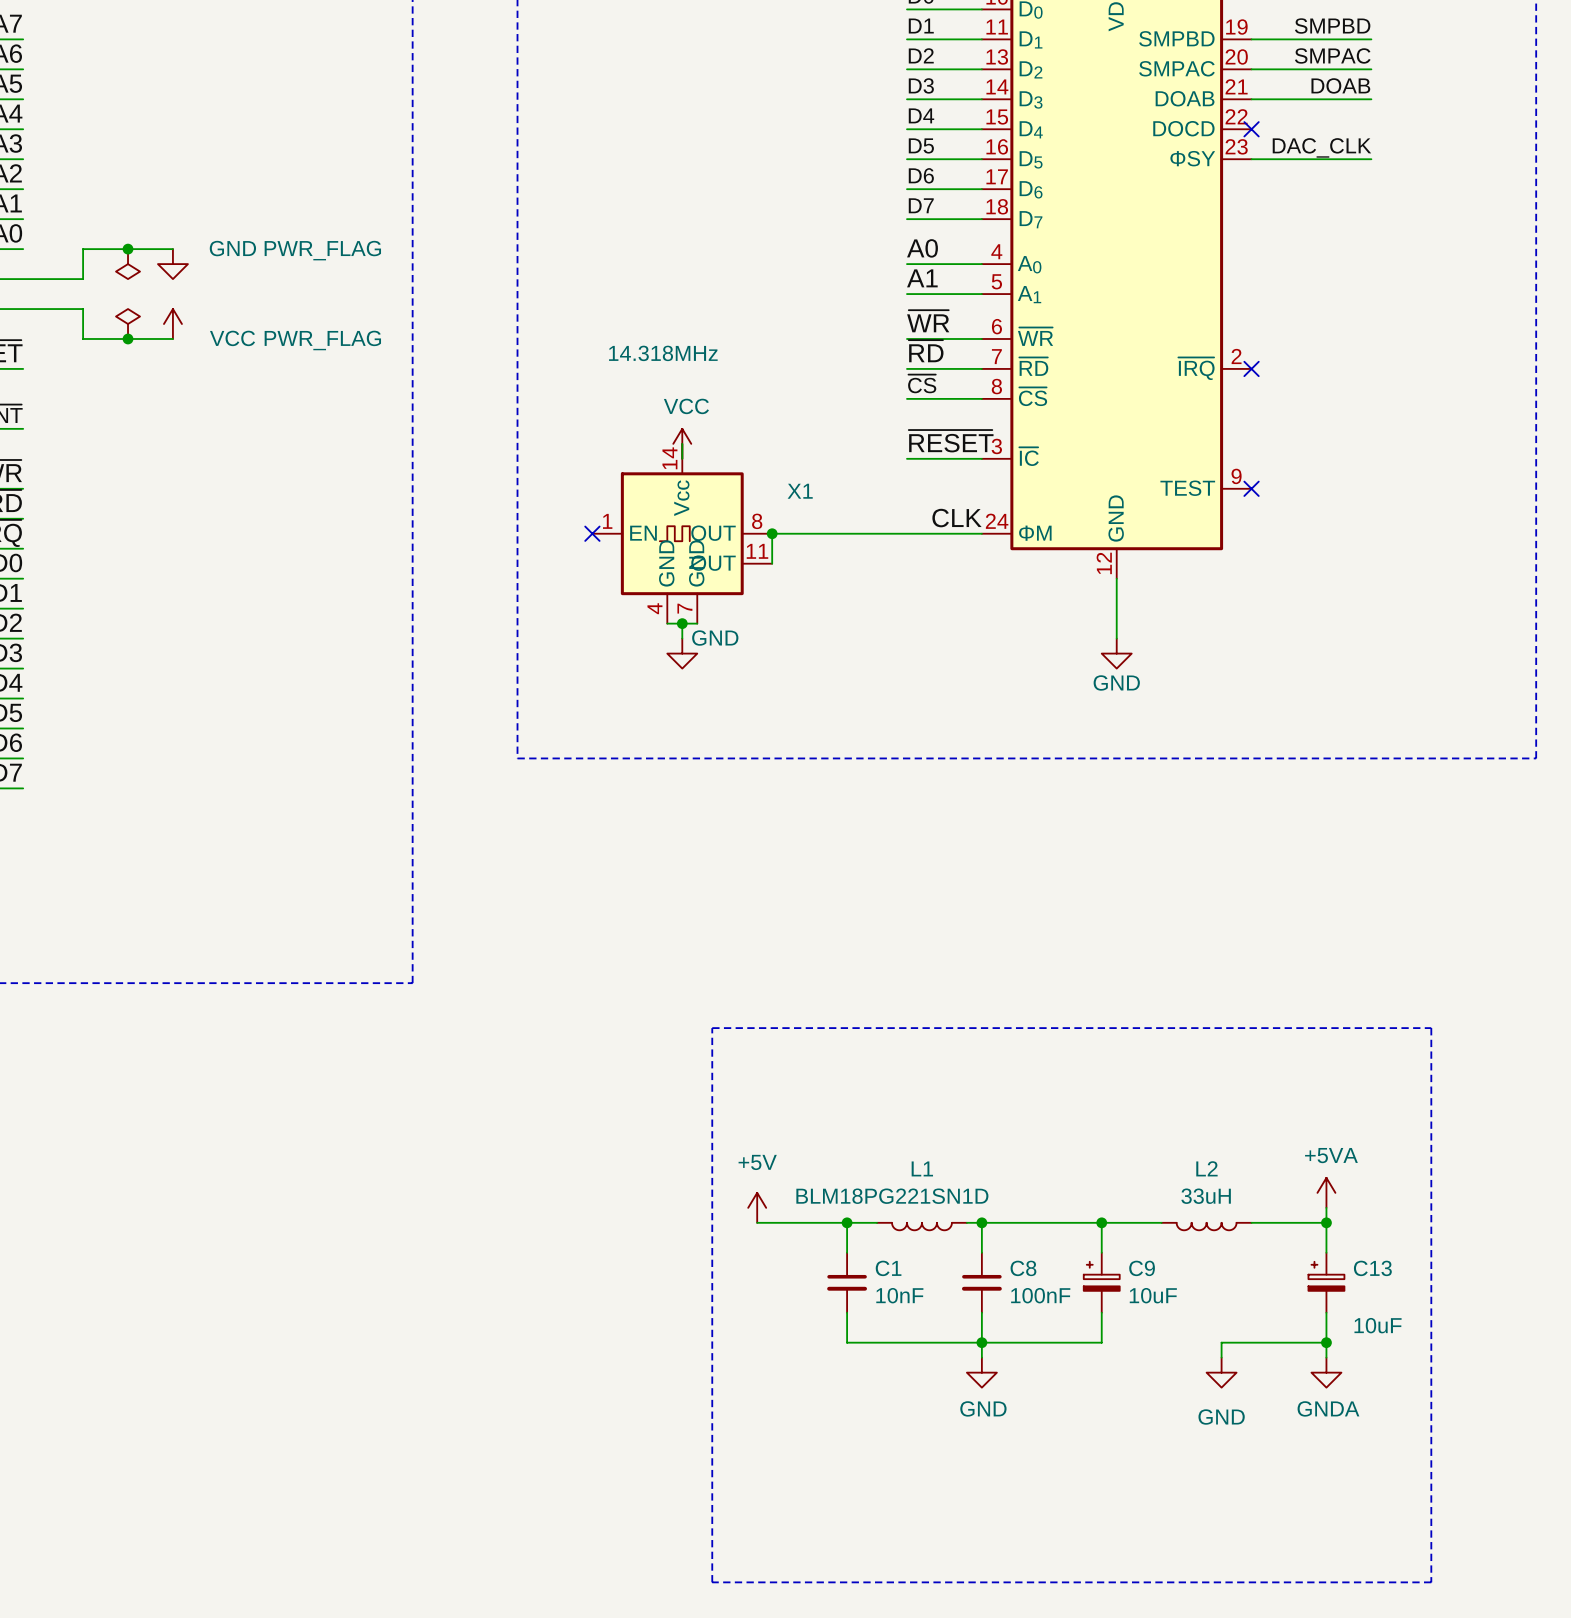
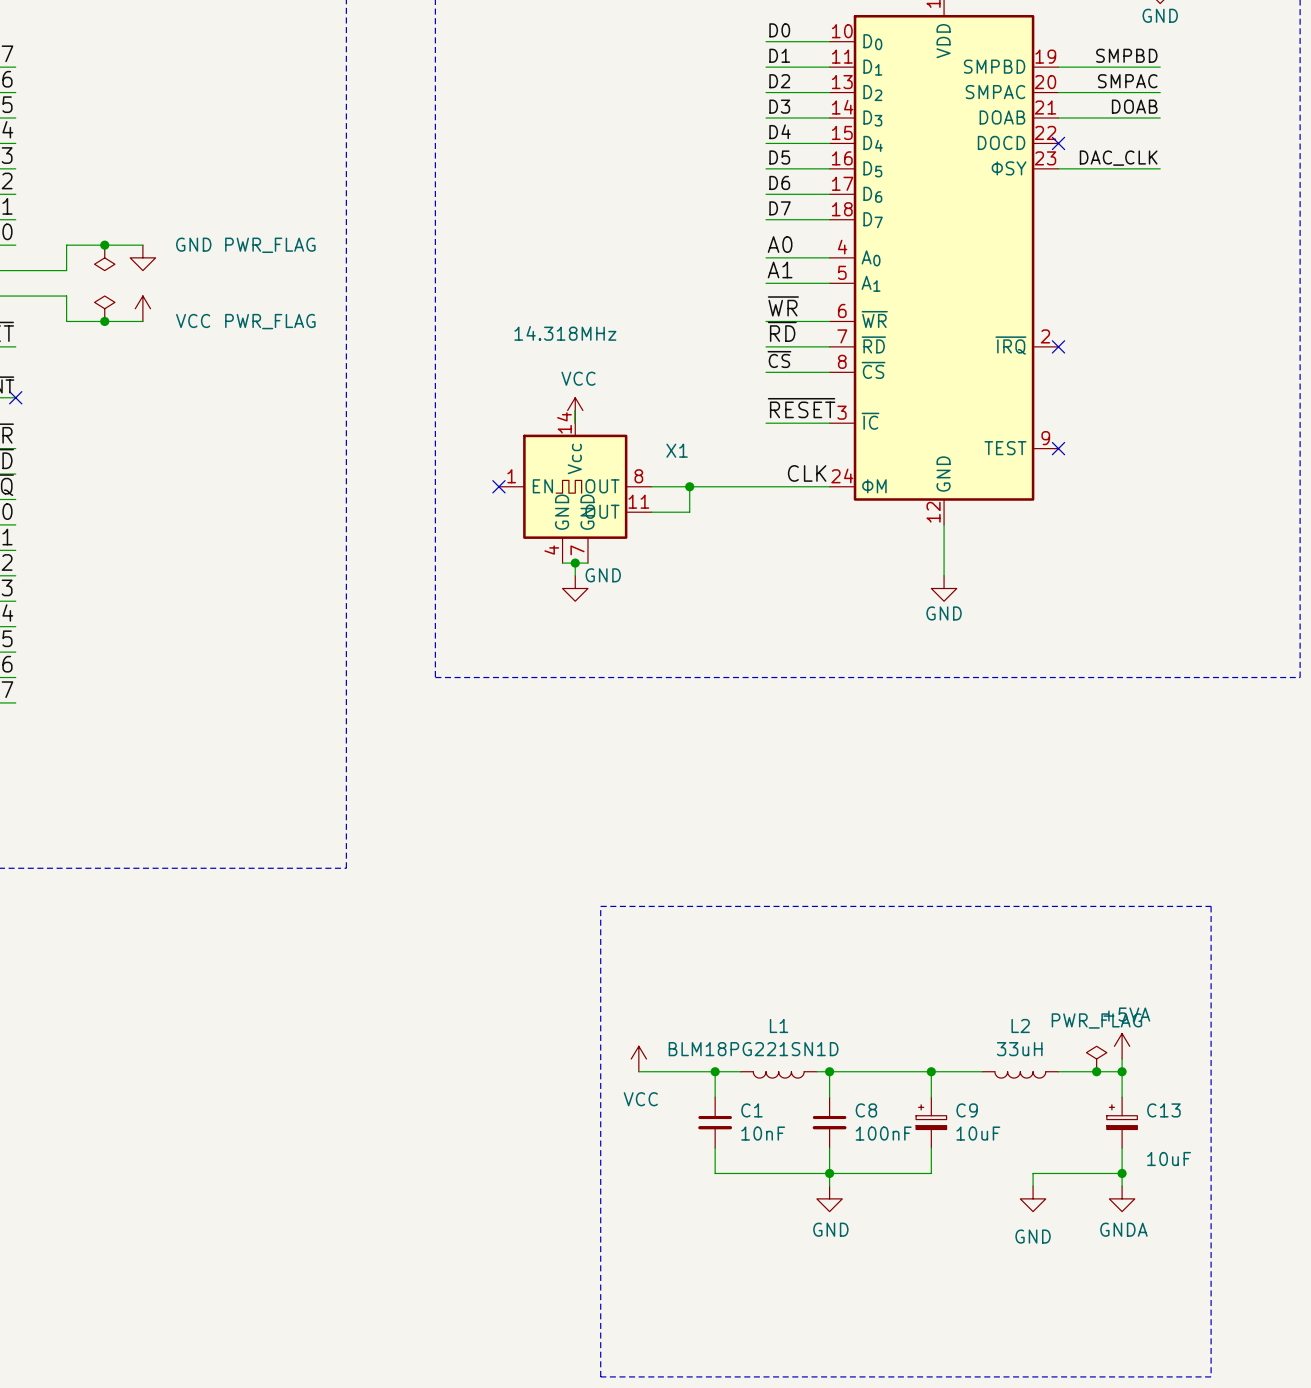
no-connect mark: none -> (15, 397)
wire: (772, 533) (772, 563) -> (689, 486) (689, 512) (651, 512)
junction position: (772, 533) -> (689, 486)
power symbol: +5V (757, 1207) -> VCC (638, 1059)
power symbol: none -> PWR_FLAG (1096, 1059)
junction: none -> (1096, 1071)

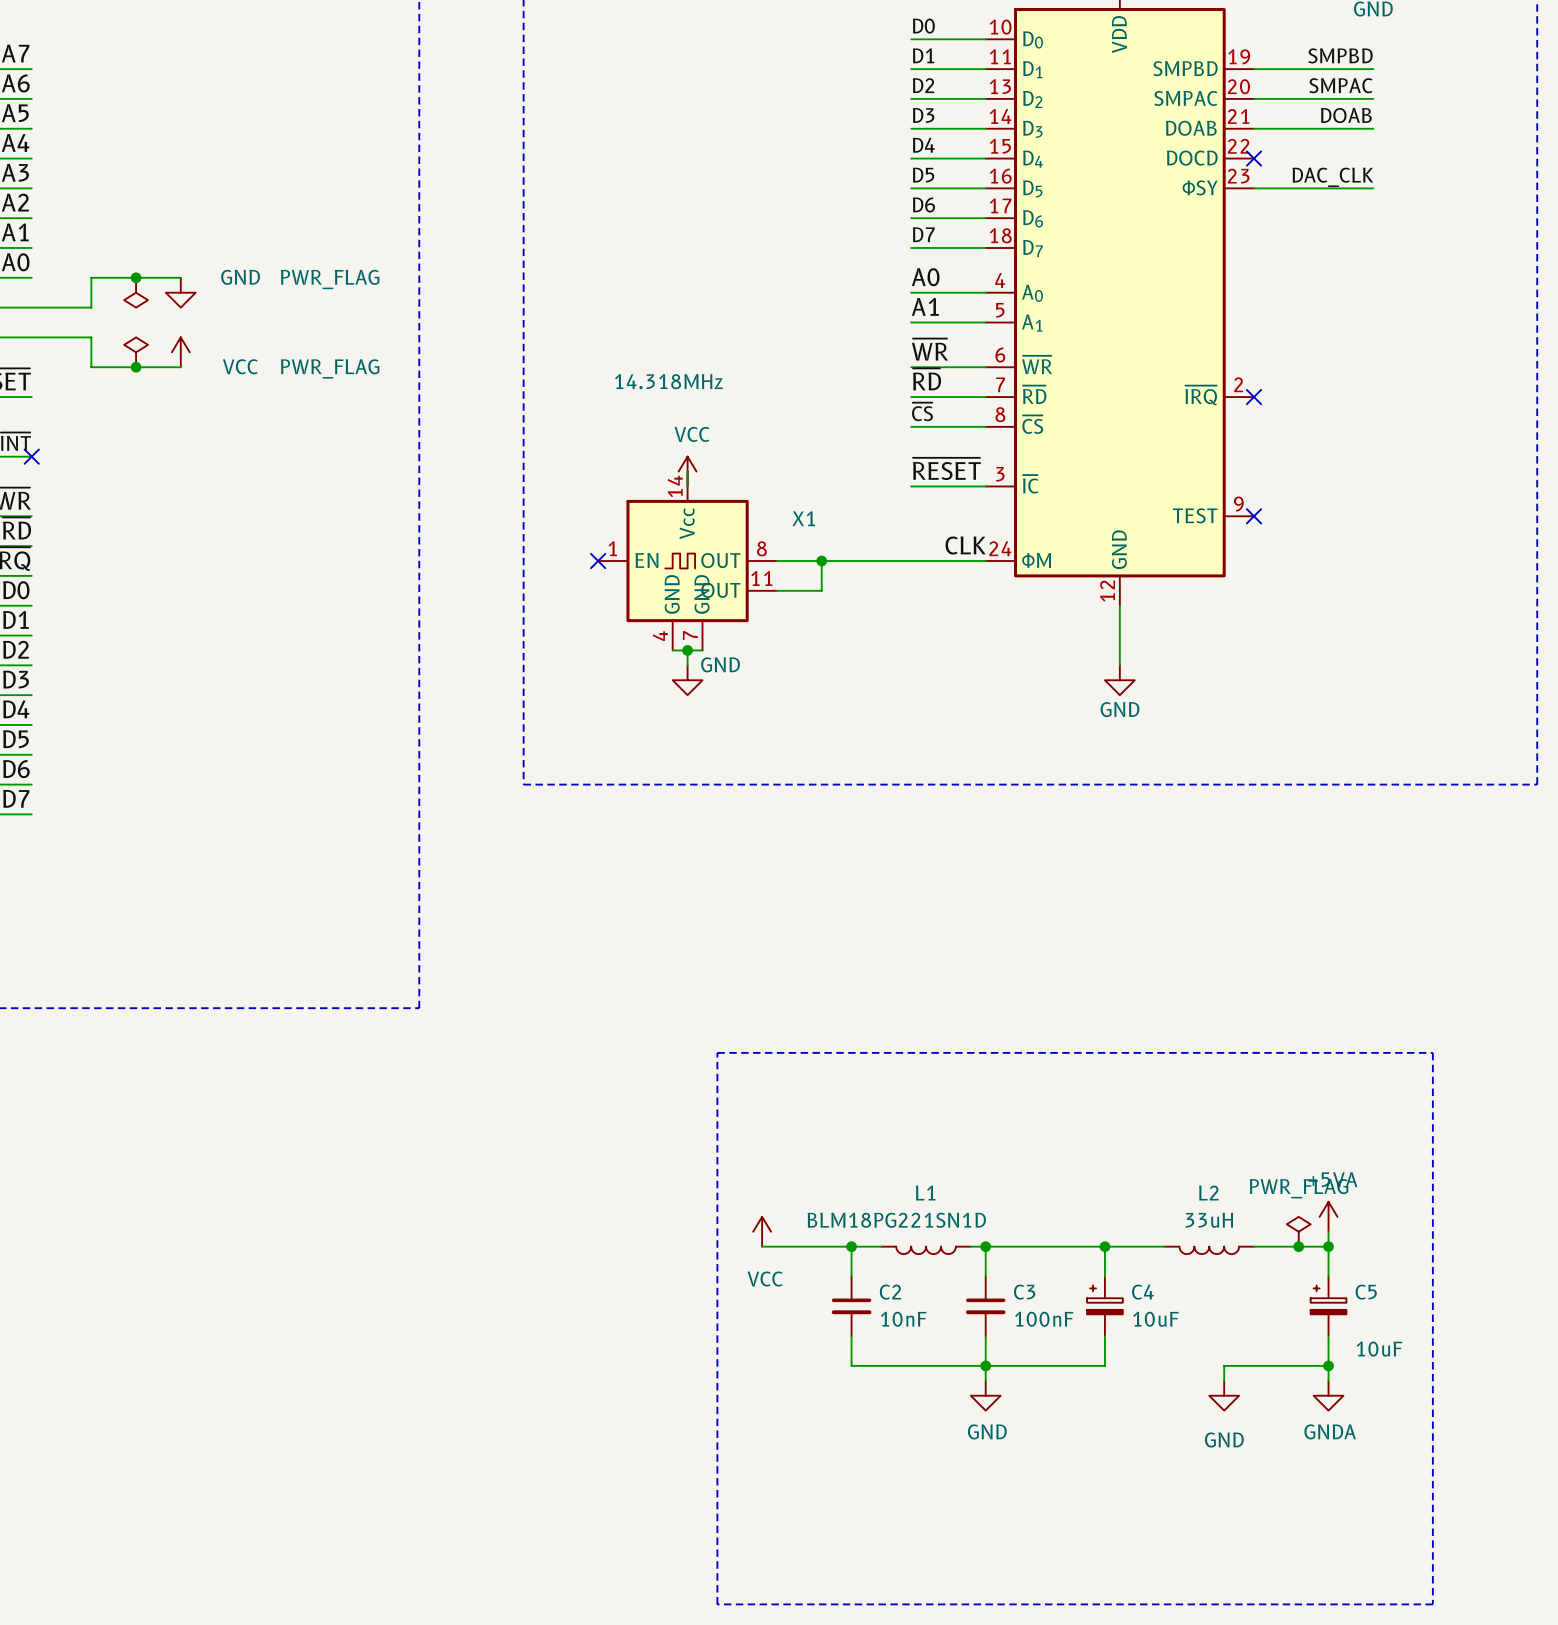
C1 name: C1 (751, 1110) -> C2 (890, 1292)
C8 name: C8 (866, 1110) -> C3 (1024, 1292)
C9 name: C9 (967, 1110) -> C4 (1142, 1292)
C13 name: C13 (1163, 1110) -> C5 (1366, 1292)

